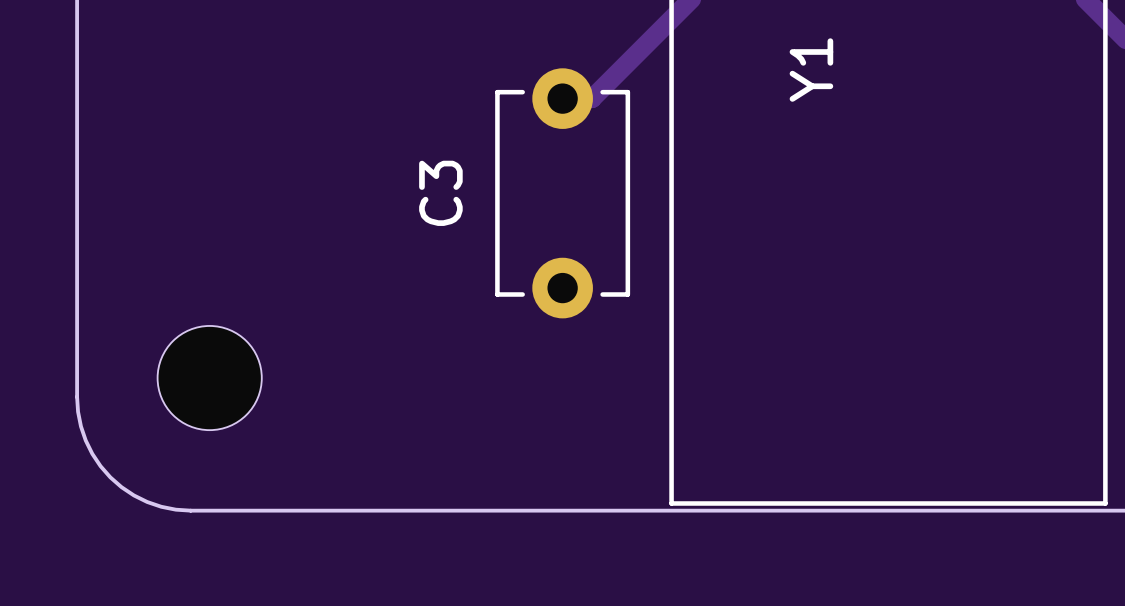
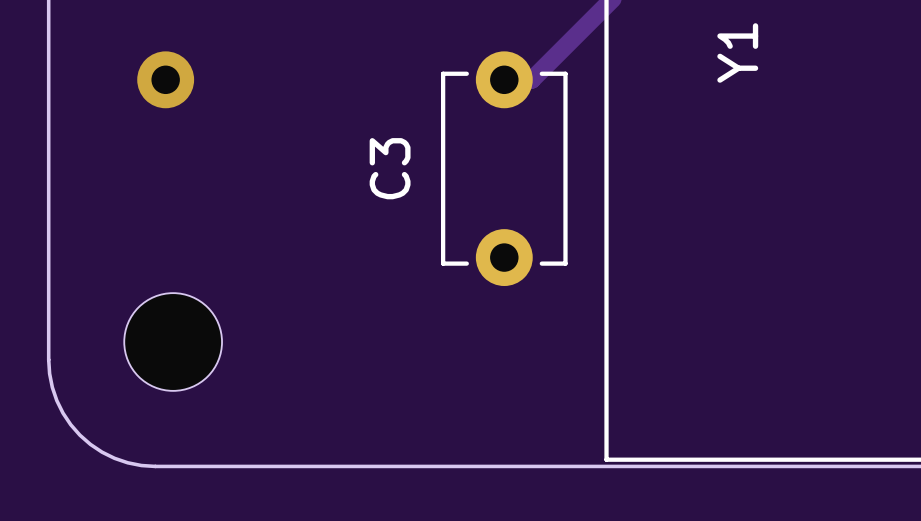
via: none -> (165, 79)

